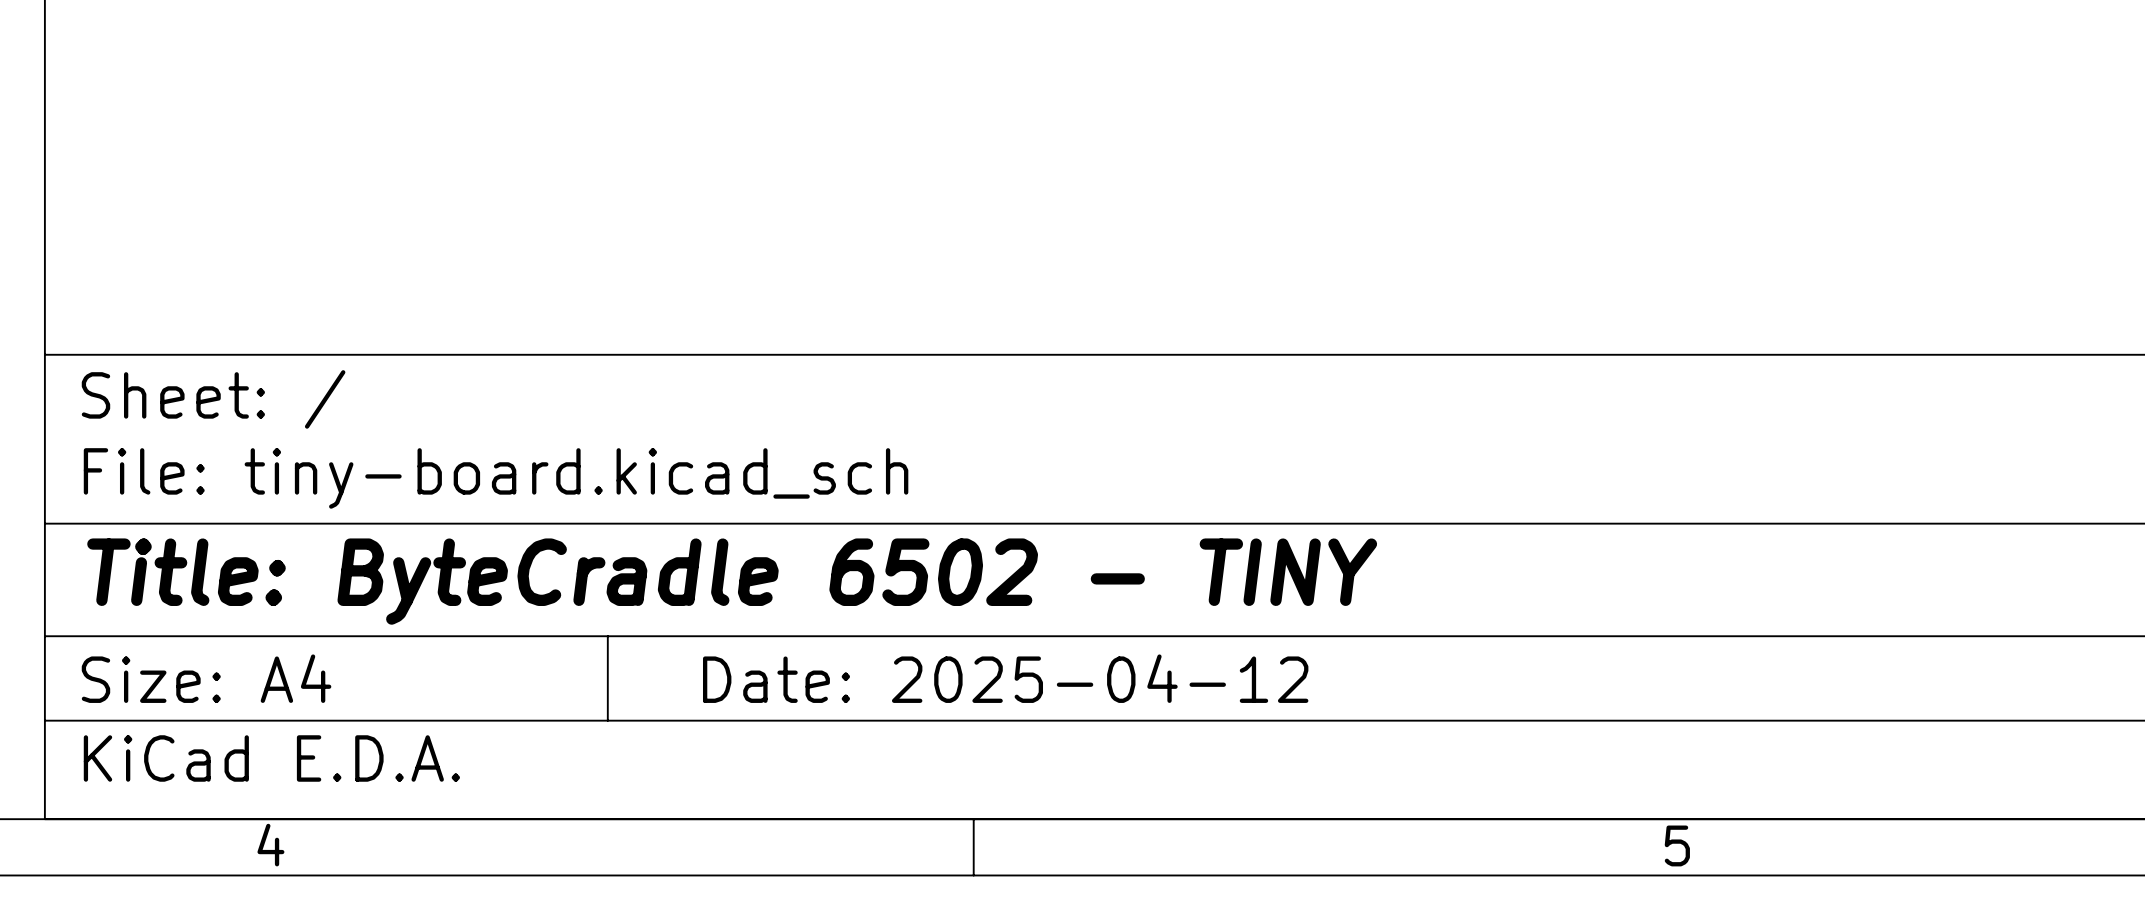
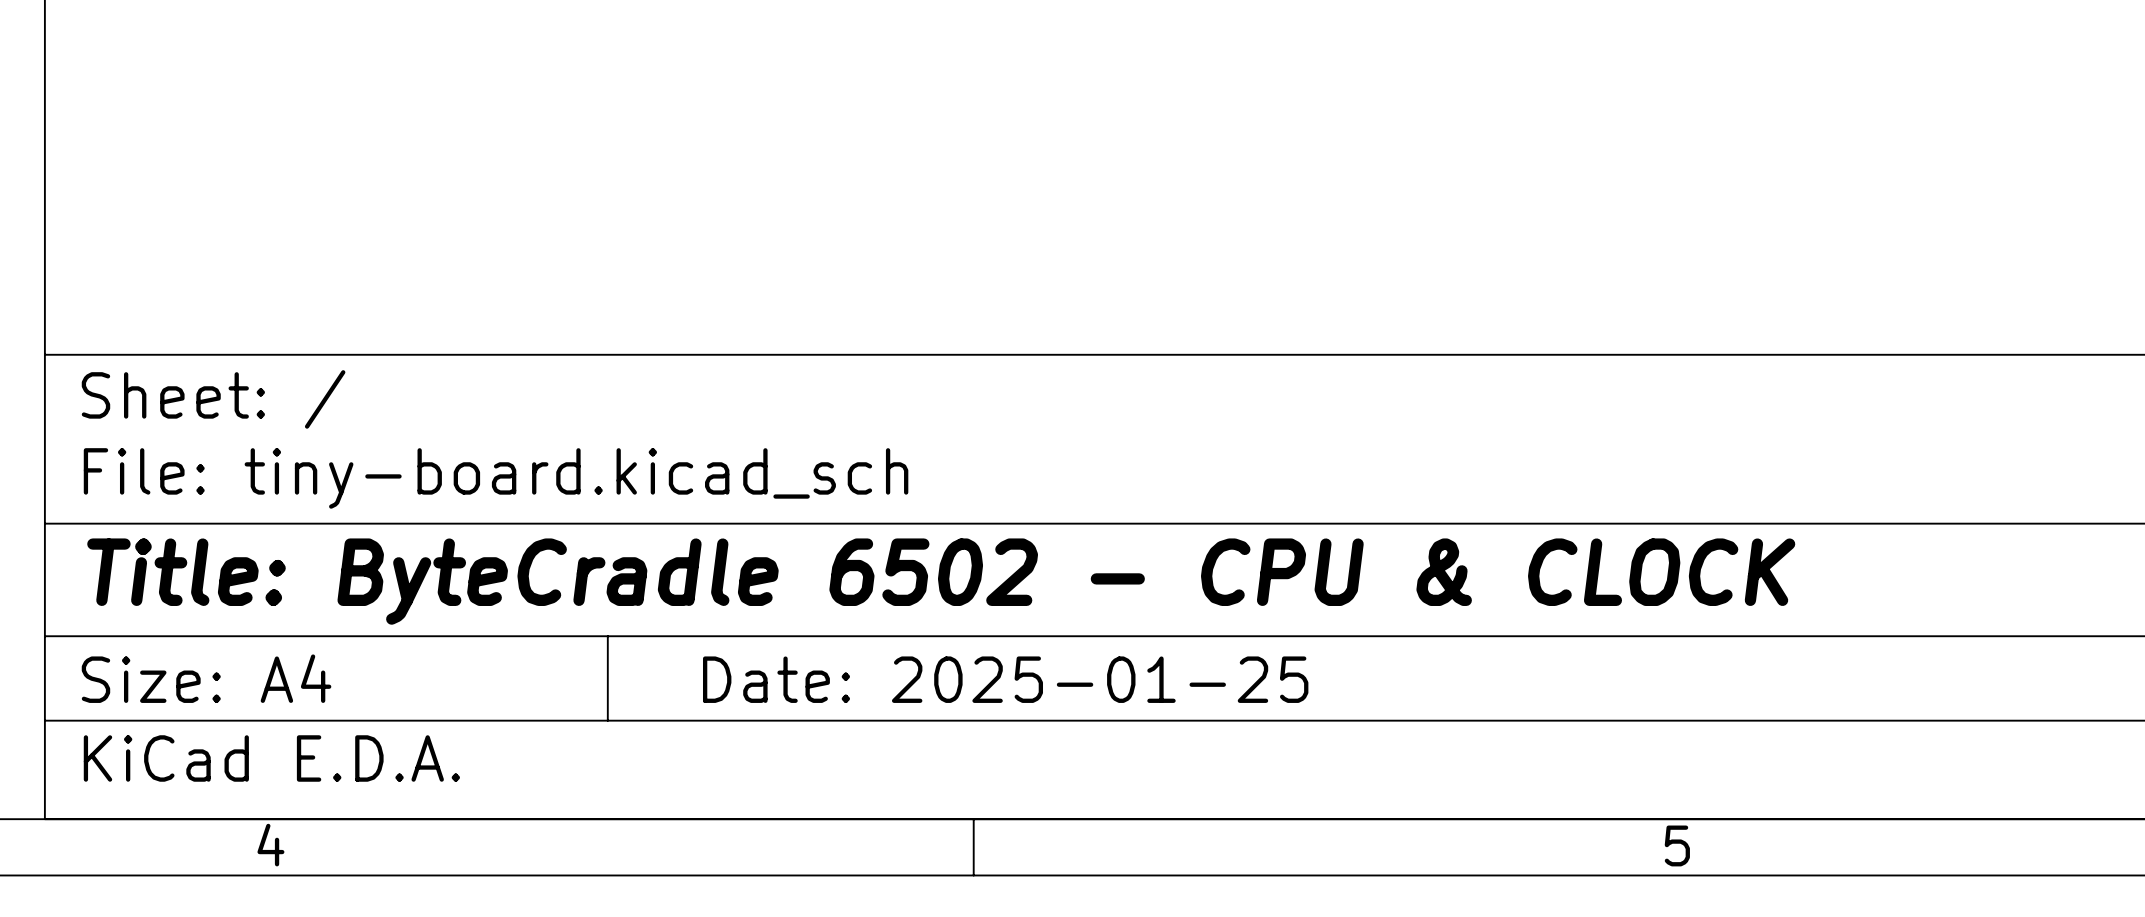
title block: Title: ByteCradle 6502 - TINY (732, 581) -> Title: ByteCradle 6502 - CPU & CLOCK (941, 581)
title block: Date: 2025-04-12 (1005, 678) -> Date: 2025-01-25 (1005, 679)

